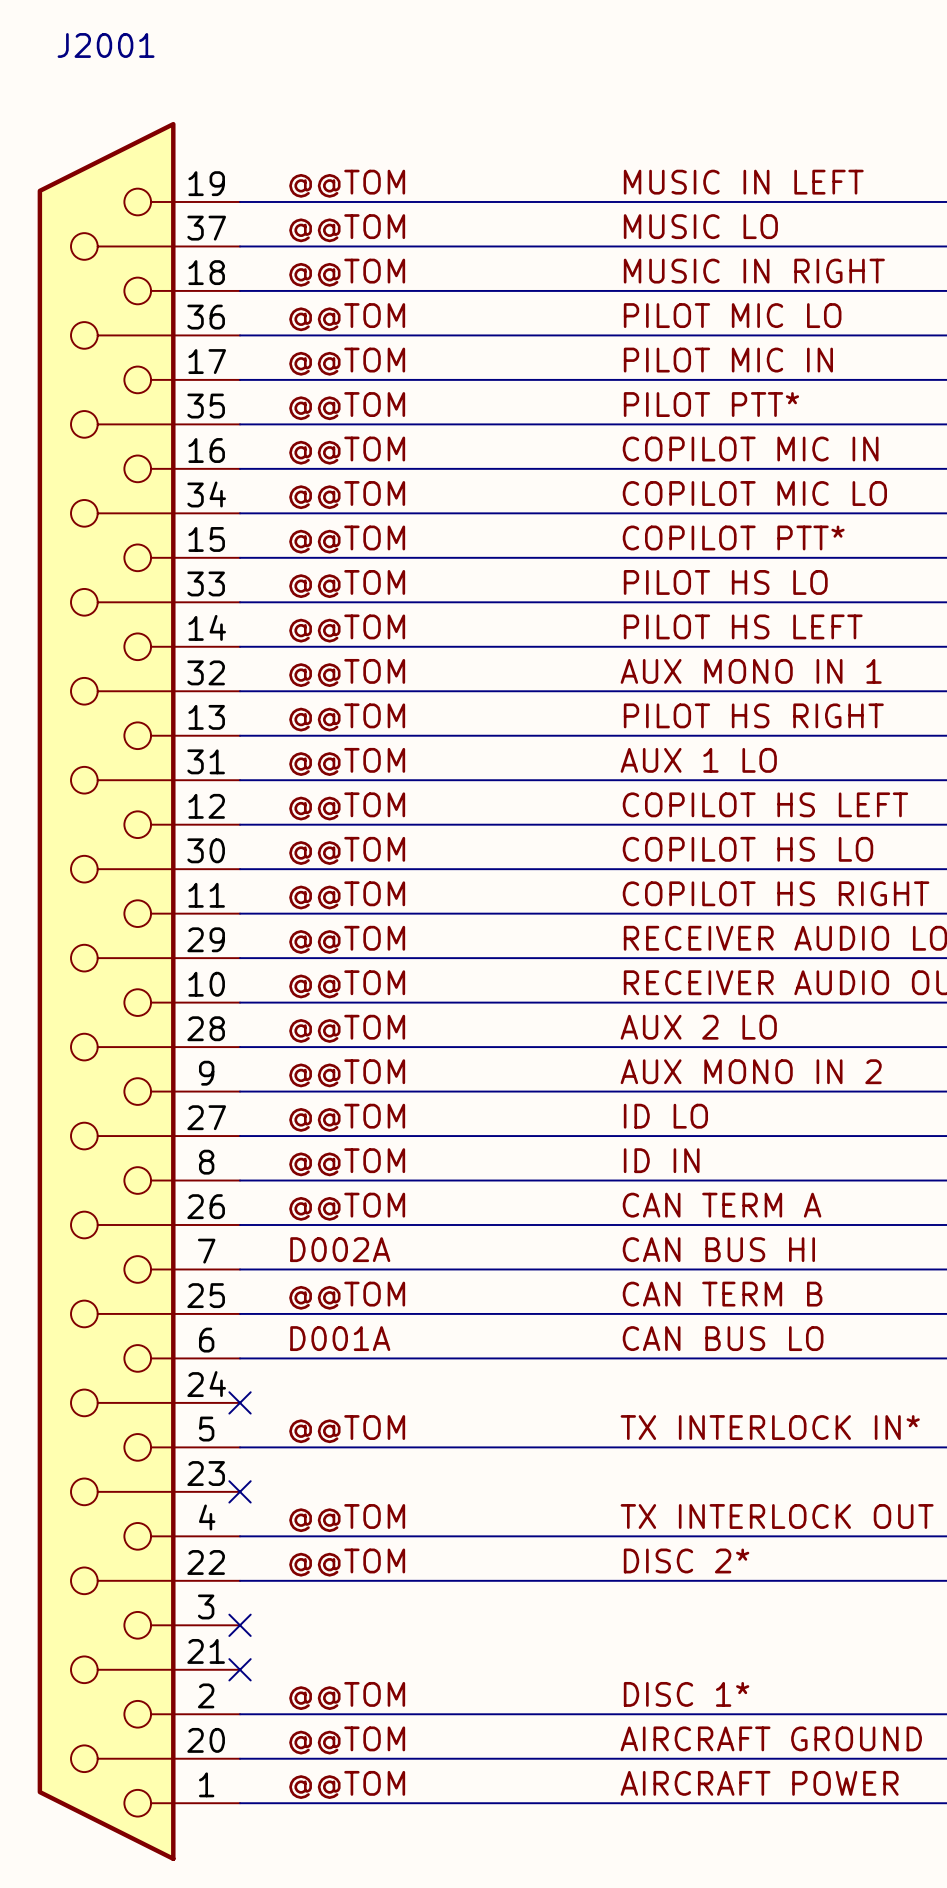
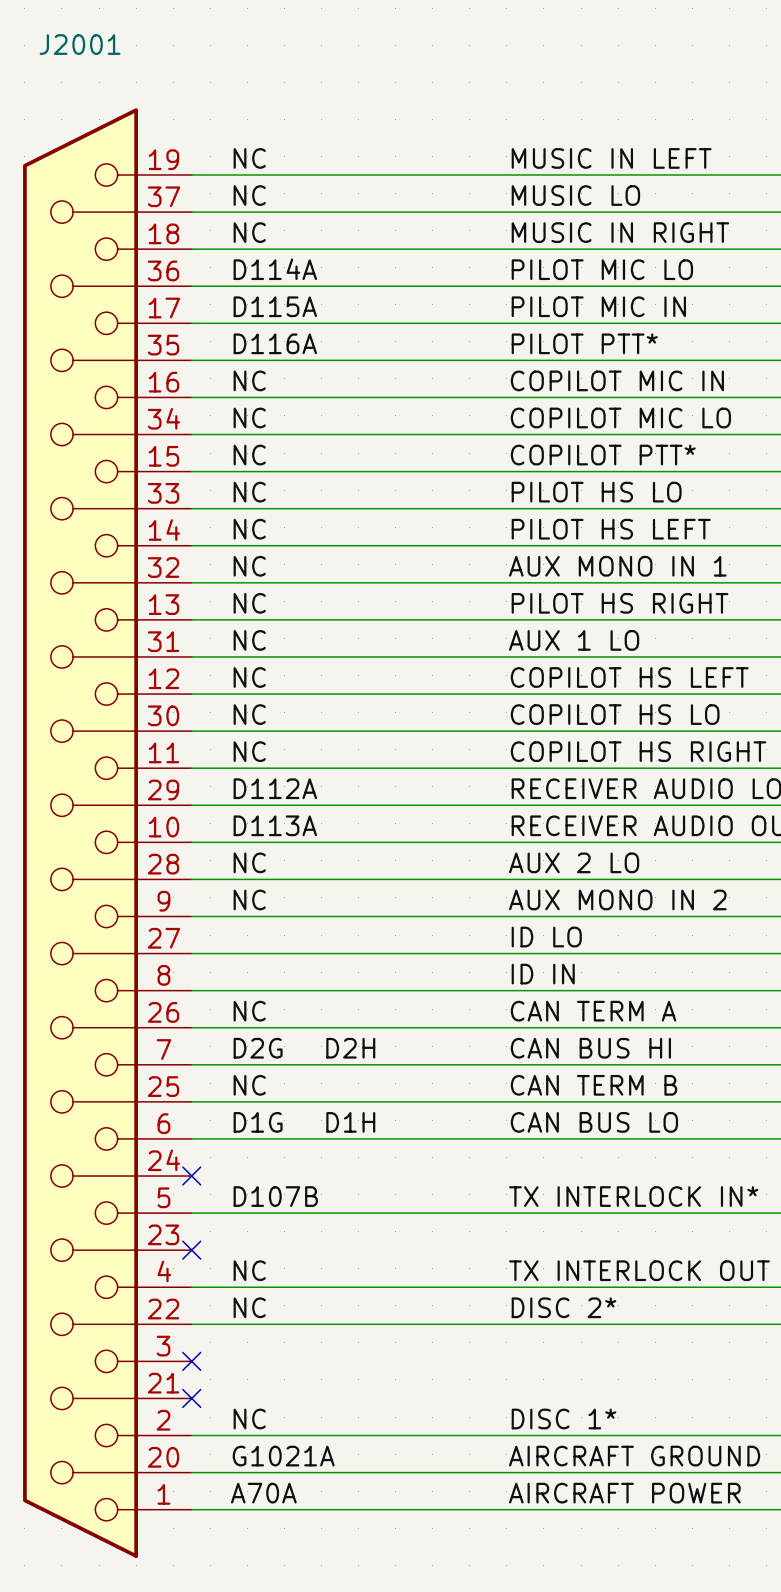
label: @@TOM (347, 183) -> NC (249, 158)
label: @@TOM (347, 228) -> NC (249, 195)
label: @@TOM (347, 272) -> NC (249, 232)
label: @@TOM (347, 317) -> D114A (275, 269)
label: @@TOM (347, 361) -> D115A (275, 306)
label: @@TOM (347, 406) -> D116A (275, 343)
label: @@TOM (347, 450) -> NC (249, 380)
label: @@TOM (347, 495) -> NC (249, 417)
label: @@TOM (347, 539) -> NC (249, 455)
label: @@TOM (347, 584) -> NC (249, 492)
label: @@TOM (347, 628) -> NC (249, 529)
label: @@TOM (347, 672) -> NC (249, 566)
label: @@TOM (347, 717) -> NC (249, 603)
label: @@TOM (347, 761) -> NC (249, 640)
label: @@TOM (347, 806) -> NC (249, 677)
label: @@TOM (347, 850) -> NC (249, 714)
label: @@TOM (347, 895) -> NC (249, 751)
label: @@TOM (347, 939) -> D112A (275, 788)
label: @@TOM (347, 984) -> D113A (275, 825)
label: @@TOM (347, 1028) -> NC (249, 862)
label: @@TOM (347, 1073) -> NC (249, 899)
label: @@TOM (347, 1117) -> none
label: @@TOM (347, 1162) -> none
label: @@TOM (347, 1206) -> NC (249, 1011)
label: D002A (340, 1249) -> D2G (258, 1048)
label: none -> D2H (350, 1048)
label: @@TOM (347, 1295) -> NC (249, 1085)
label: D001A (340, 1338) -> D1G (258, 1122)
label: none -> D1H (350, 1122)
label: @@TOM (347, 1429) -> D107B (275, 1196)
label: @@TOM (347, 1518) -> NC (249, 1270)
label: @@TOM (347, 1562) -> NC (249, 1307)
label: @@TOM (347, 1696) -> NC (249, 1418)
label: @@TOM (347, 1740) -> G1021A (283, 1456)
label: @@TOM (347, 1784) -> A70A (263, 1493)

